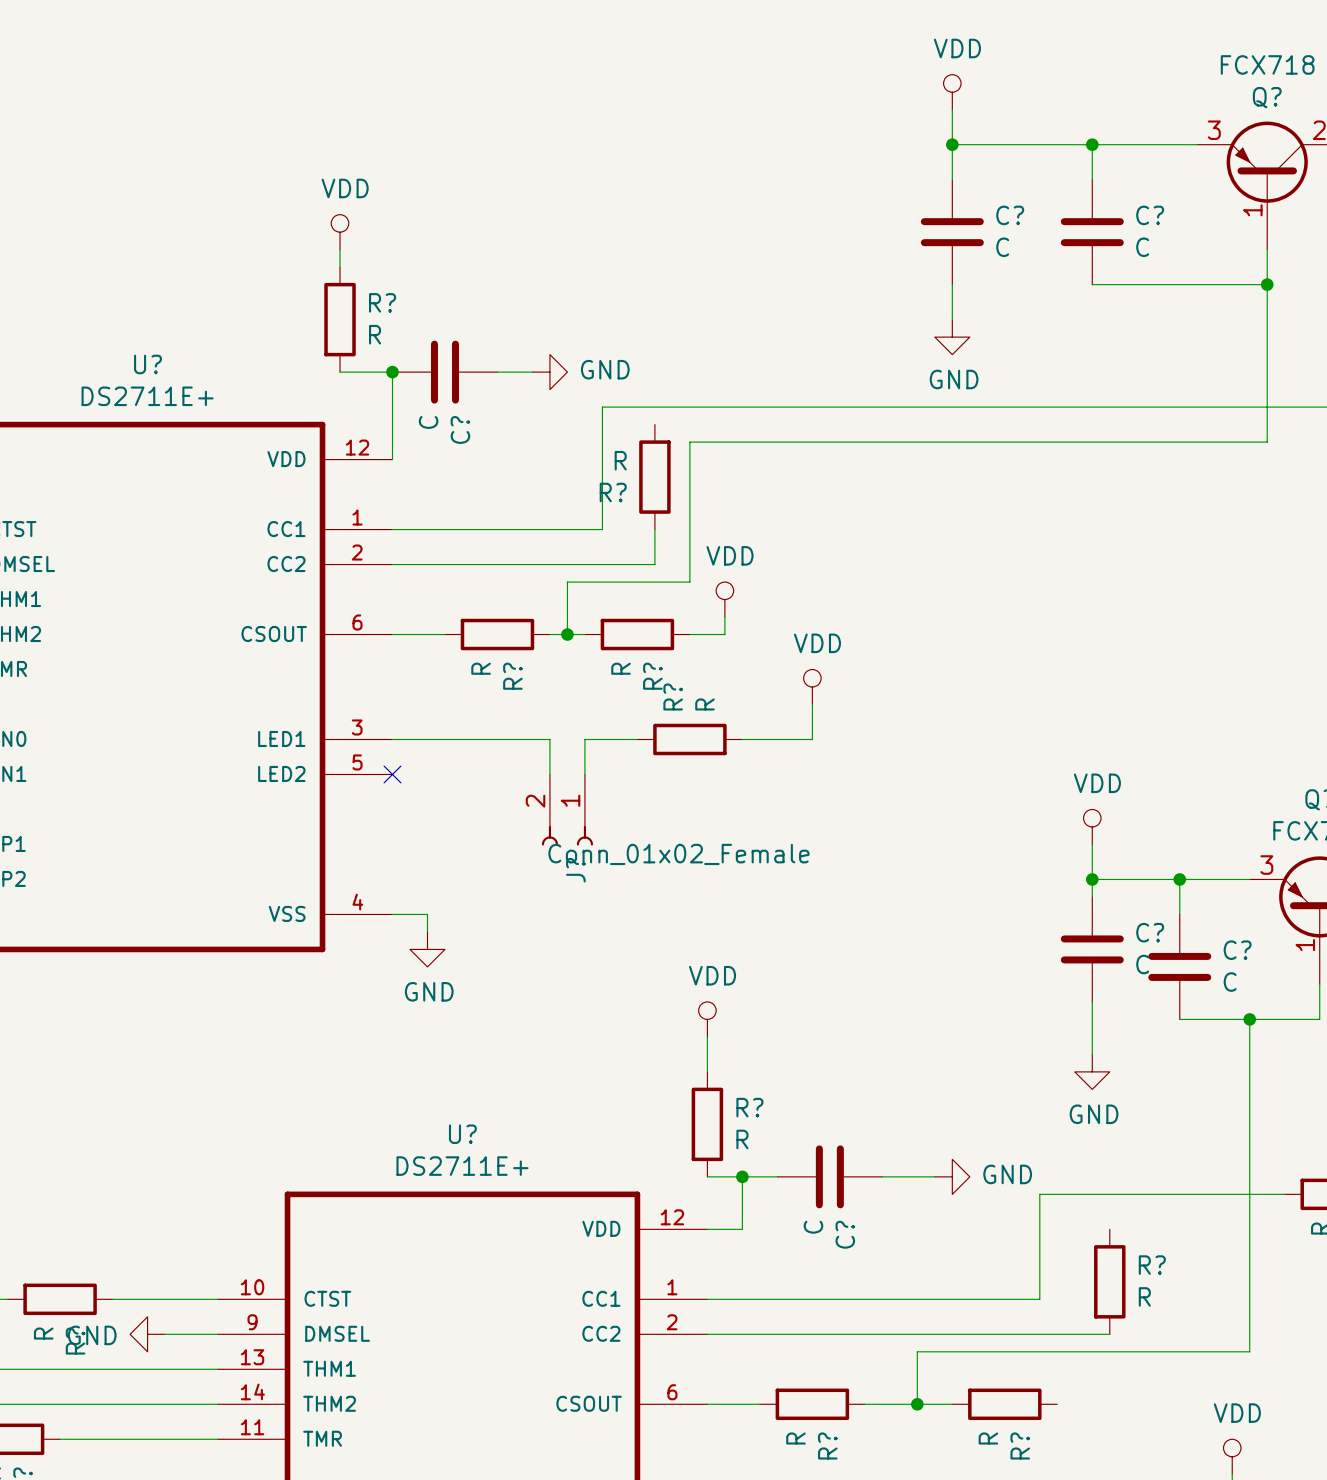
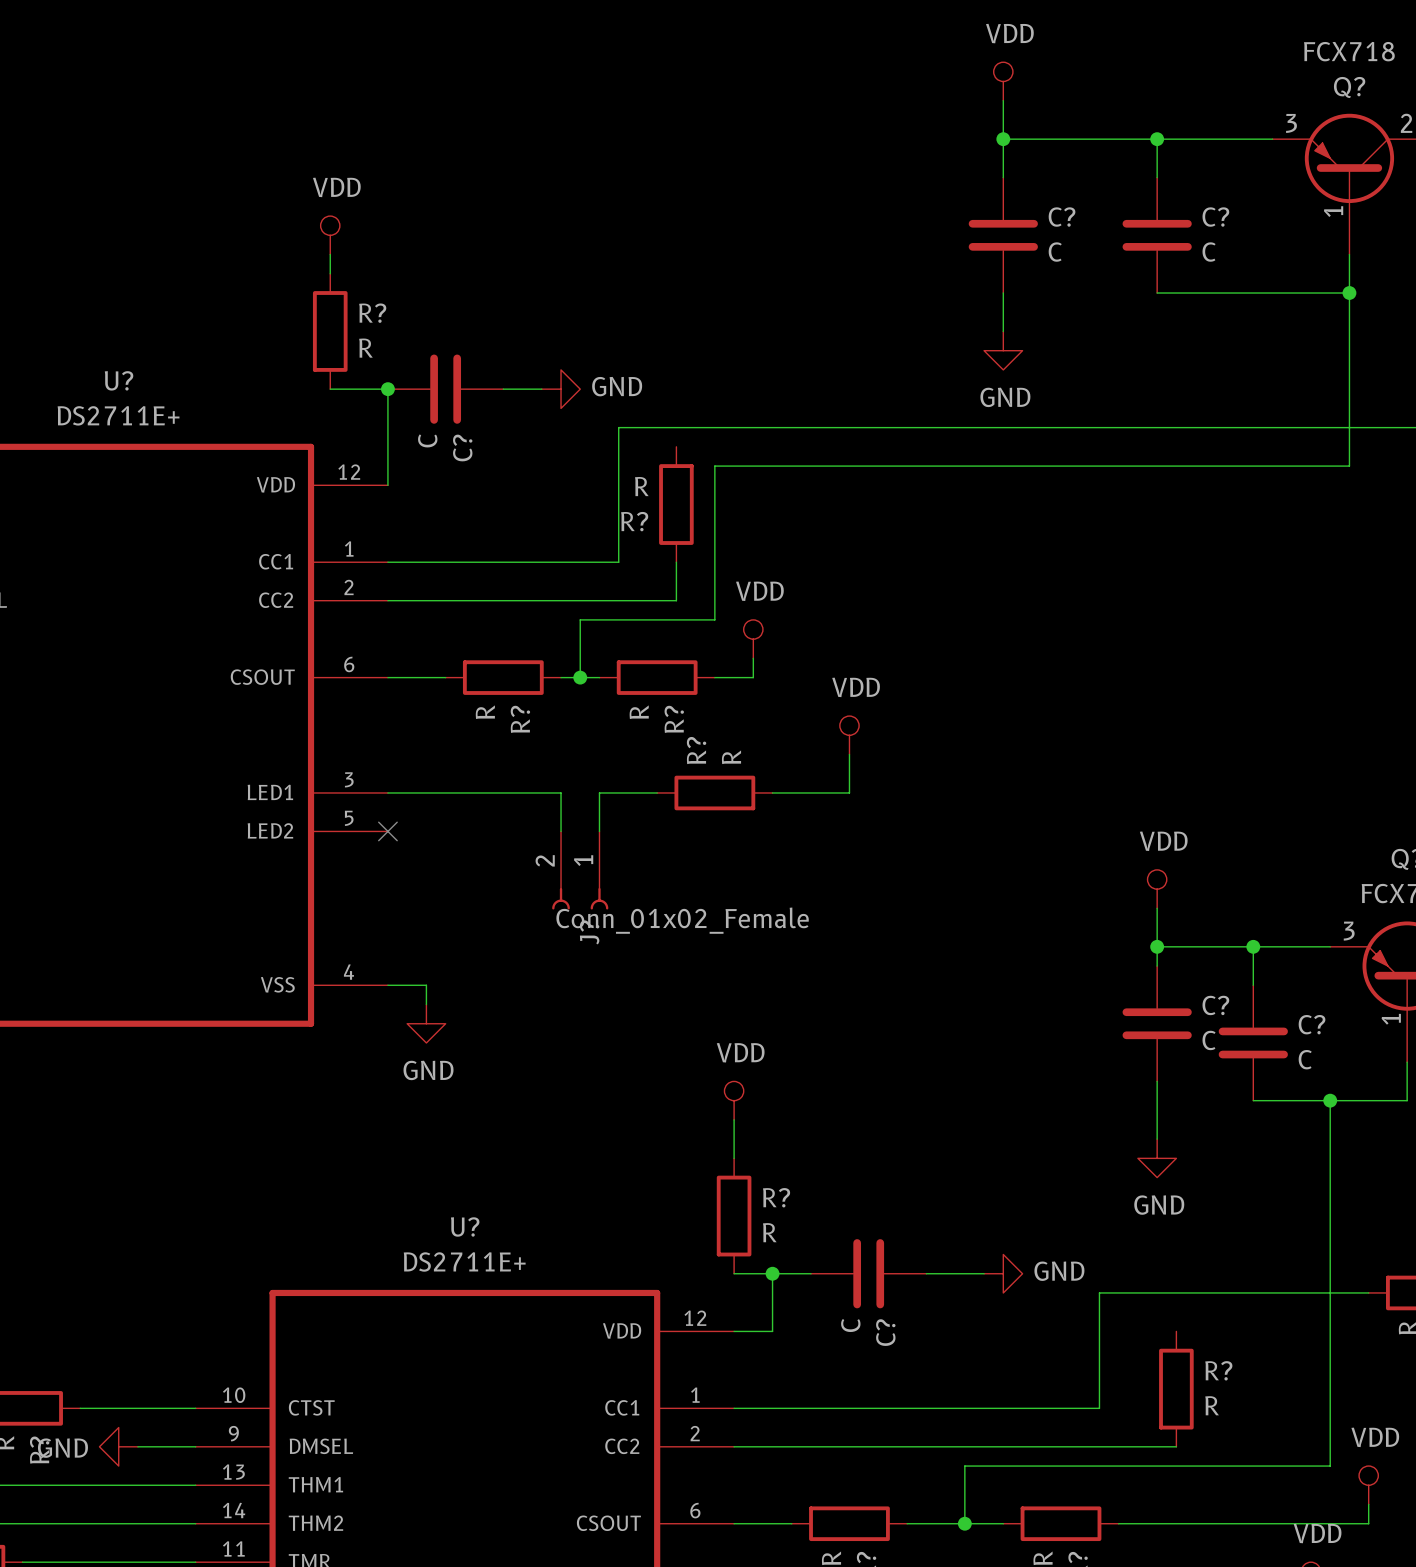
power symbol: none -> VDD (1368, 1485)
wire: none -> (1368, 1504) (1368, 1523) (1118, 1523)

